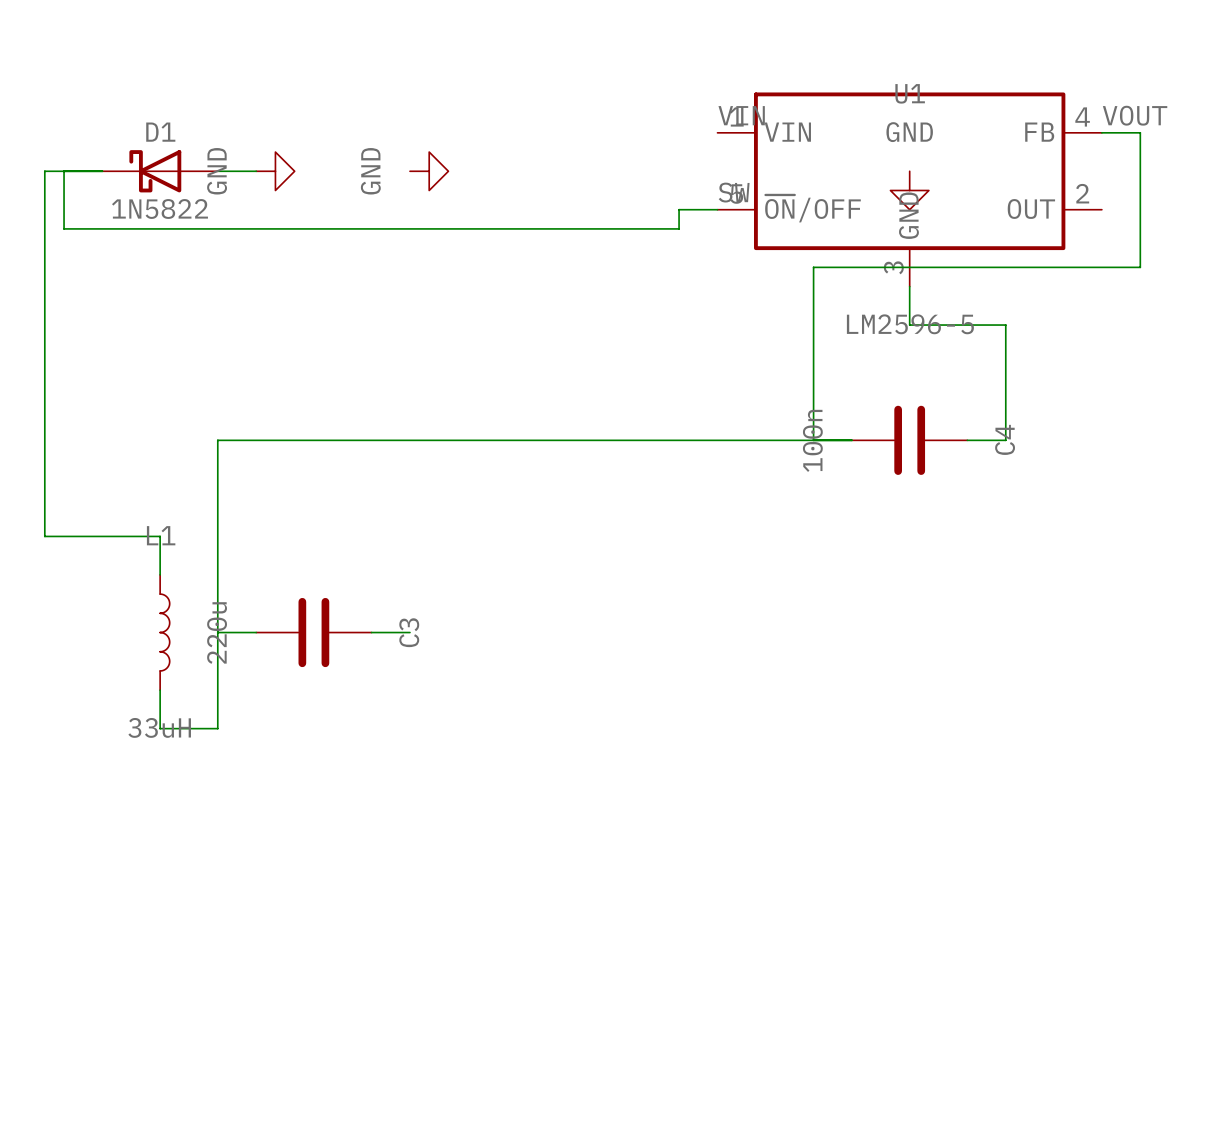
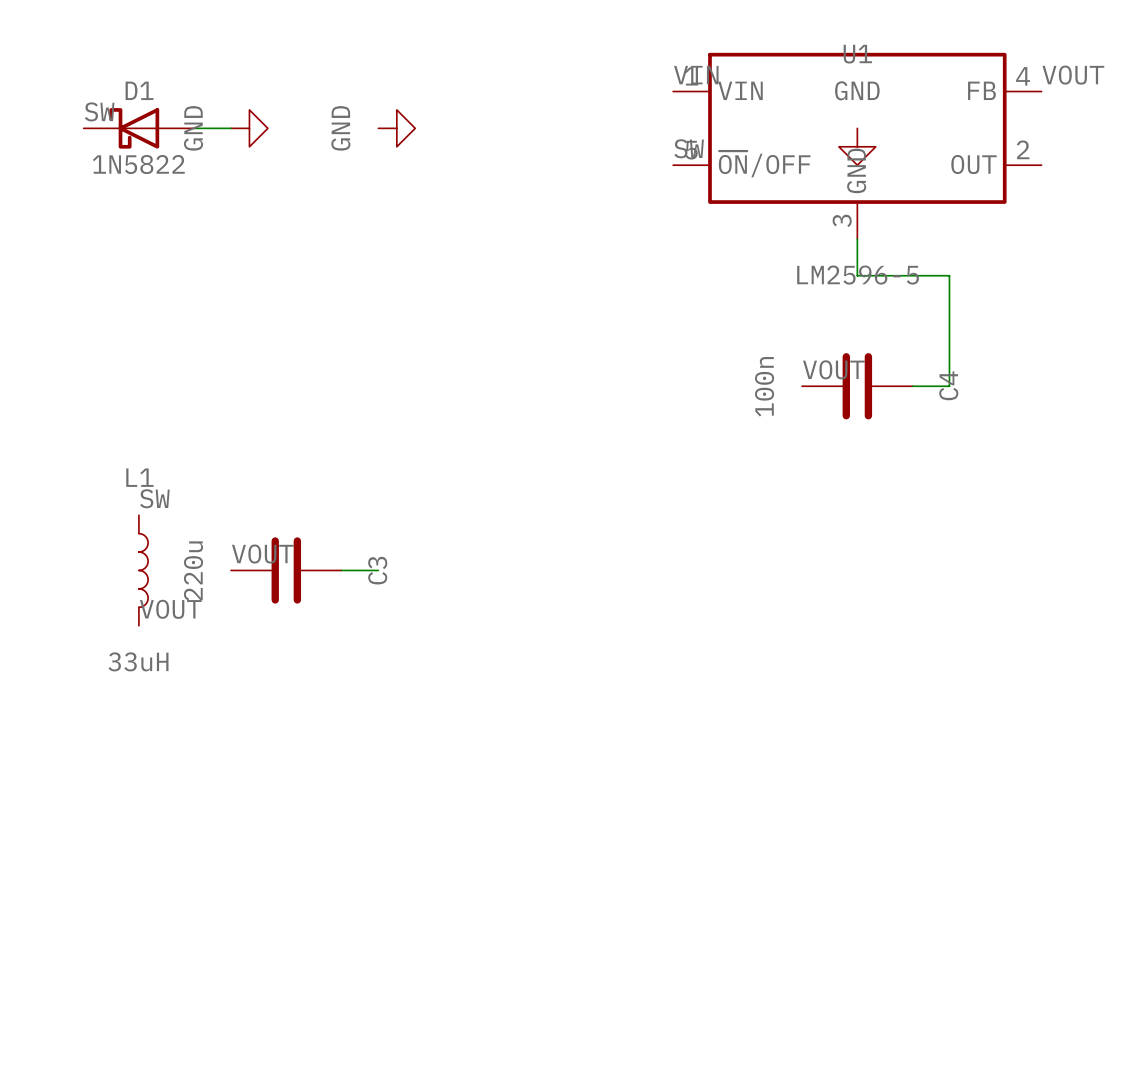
wire: (1101, 132) (1140, 132) (1140, 267) (813, 267) (813, 440) -> none
label: none -> SW (99, 111)
wire: (64, 171) (64, 228) (679, 228) (679, 209) (717, 209) -> none
wire: (102, 171) (44, 171) (44, 536) (160, 536) (160, 574) -> none
label: none -> VOUT (833, 369)
wire: (852, 440) (217, 440) (217, 728) (160, 728) (160, 690) -> none
label: none -> SW (154, 498)
label: none -> VOUT (262, 554)
wire: (217, 632) (256, 632) -> none
label: none -> VOUT (170, 609)

